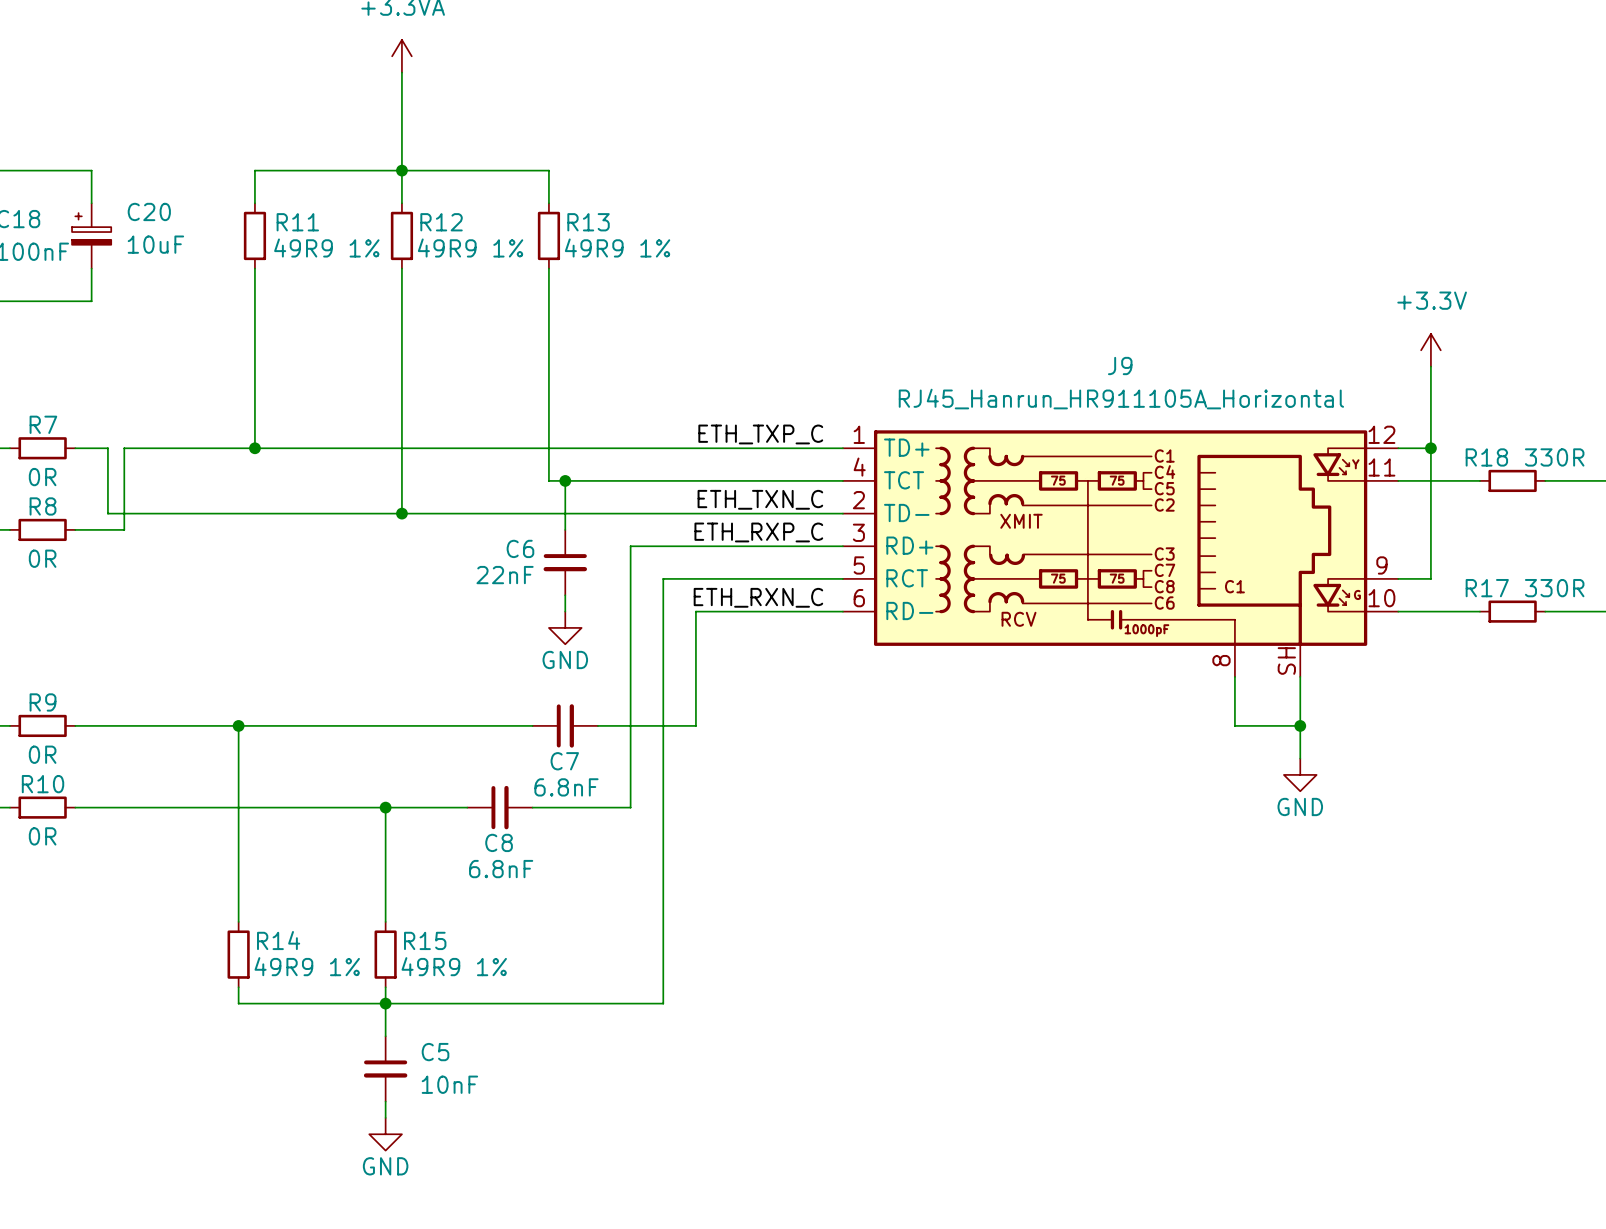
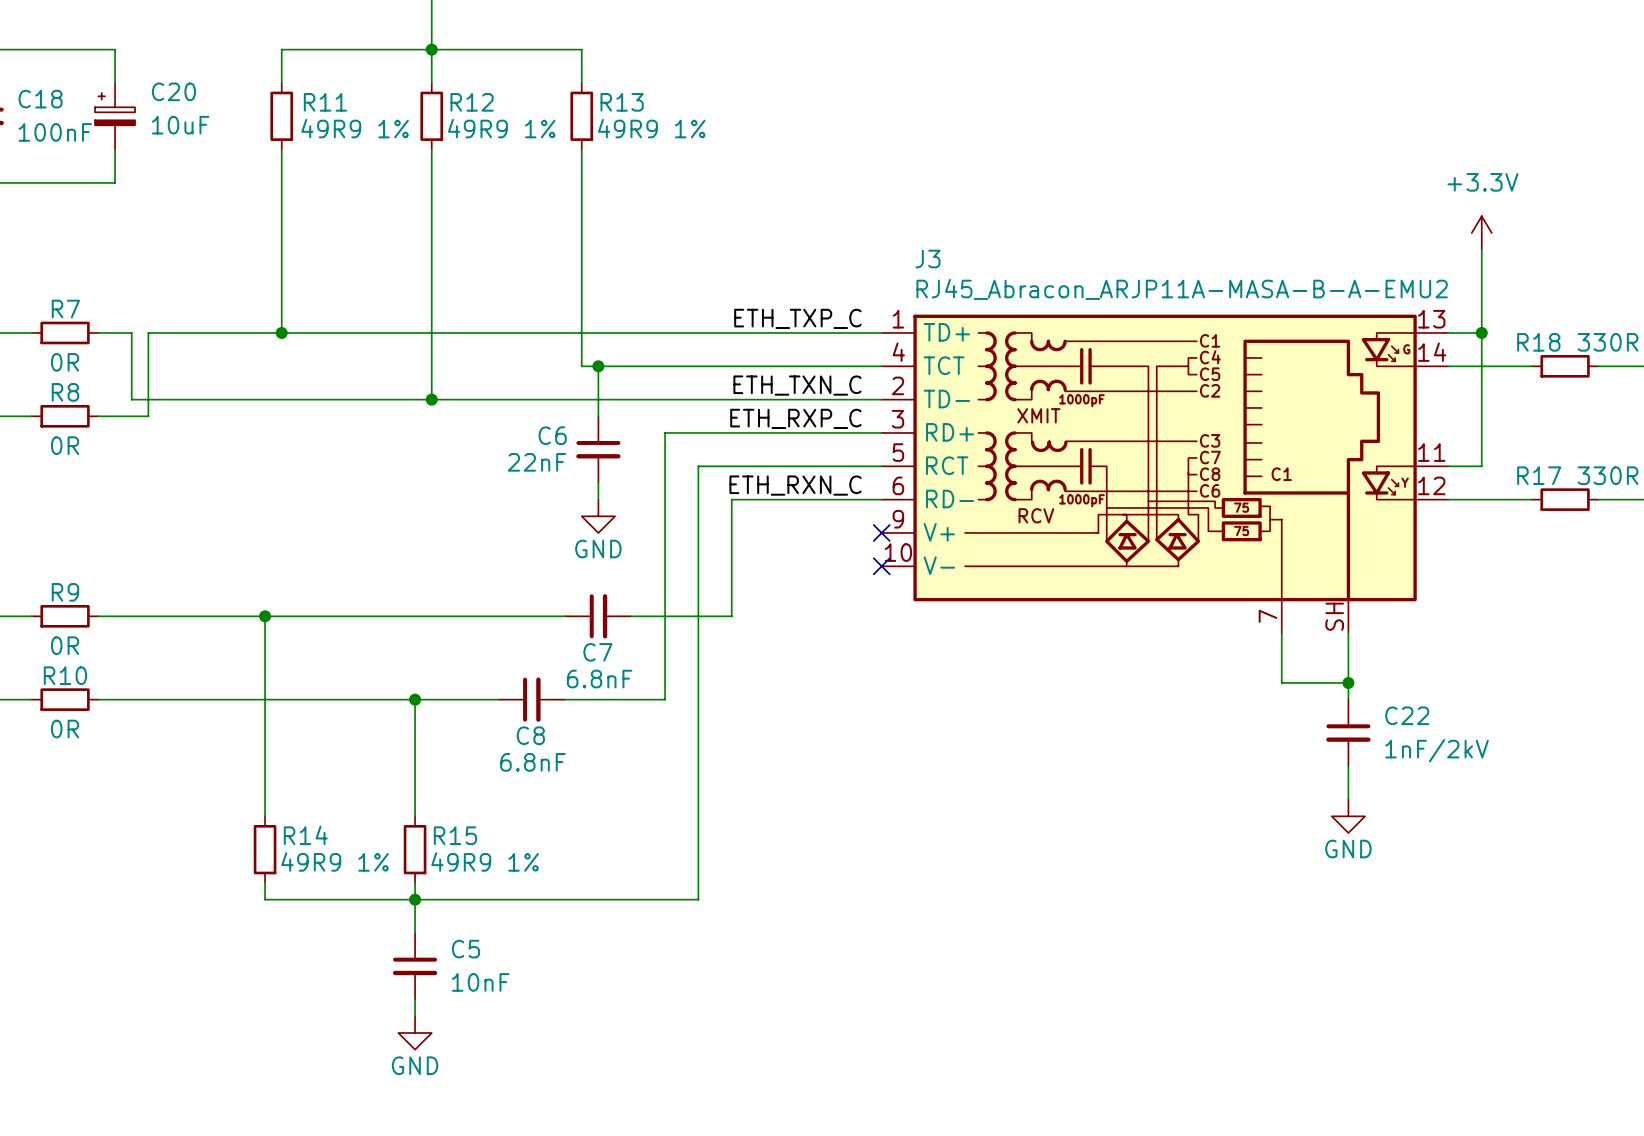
J9: RJ45_Hanrun_HR911105A_Horizontal (1120, 553) -> none
J3: none -> RJ45_Abracon_ARJP11A-MASA-B-A-EMU2 (1165, 473)
no-connect mark: none -> (881, 532)
no-connect mark: none -> (881, 566)
wire: (1234, 676) (1234, 725) (1300, 725) -> (1281, 632) (1281, 682) (1348, 682)
junction position: (1300, 725) -> (1348, 682)
wire: none -> (1348, 649) (1348, 699)
power symbol position: GND (1300, 774) -> GND (1348, 816)
C22: none -> 1nF/2kV (1348, 732)
wire: none -> (1348, 766) (1348, 799)

